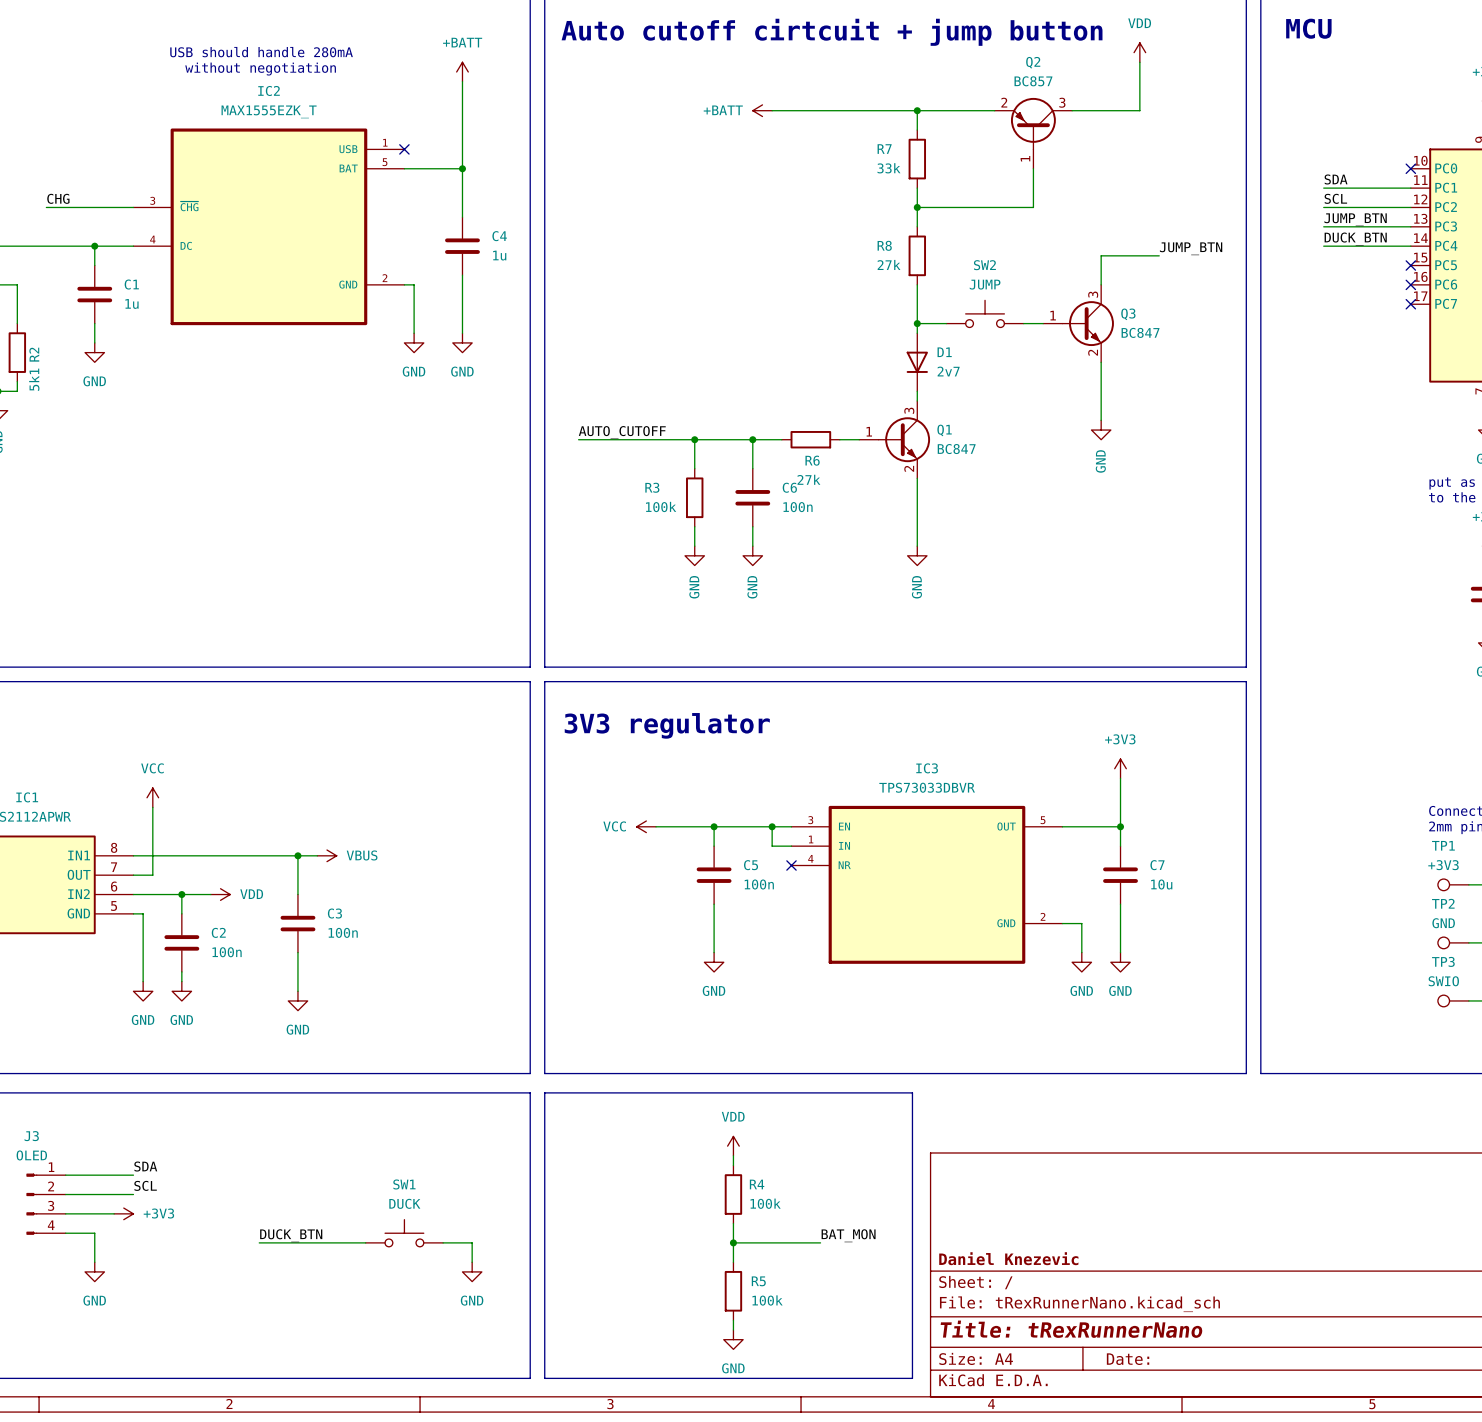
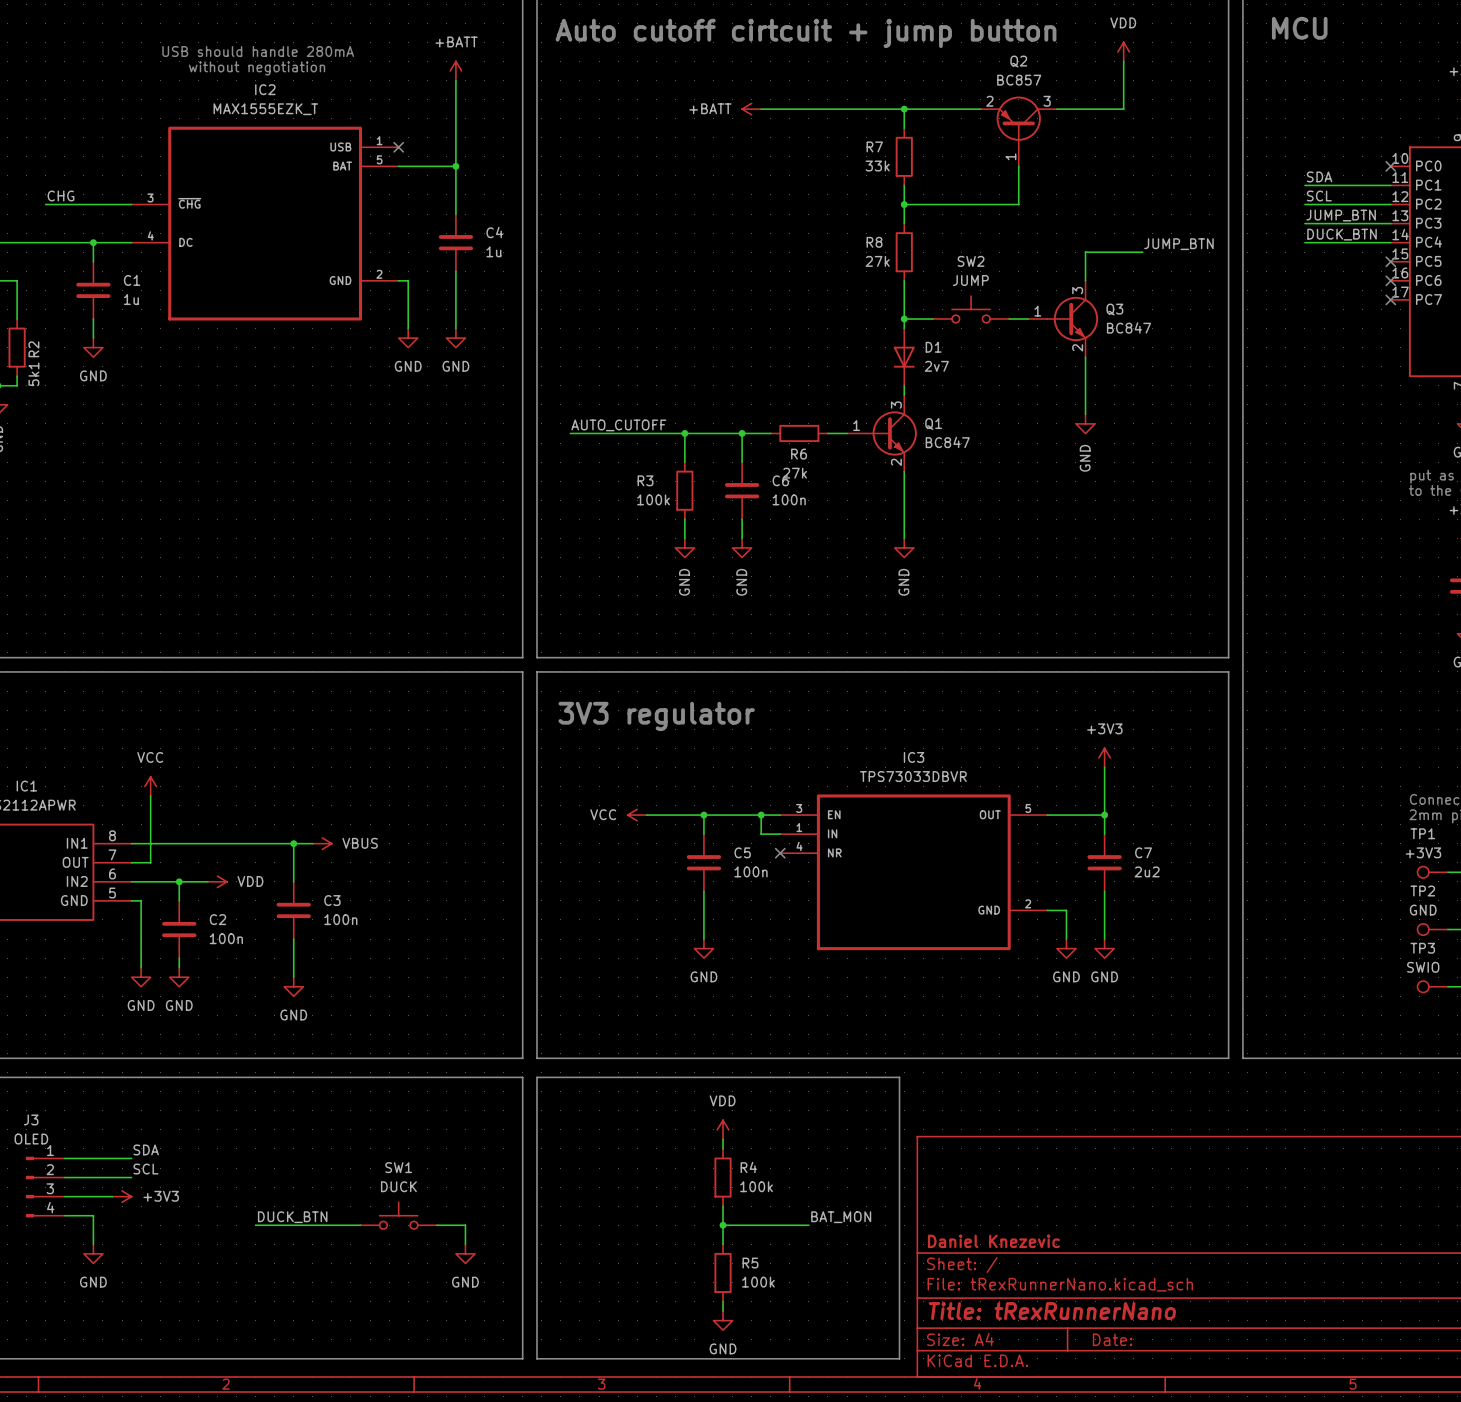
C7 value: 10u (1161, 884) -> 2u2 (1147, 871)

